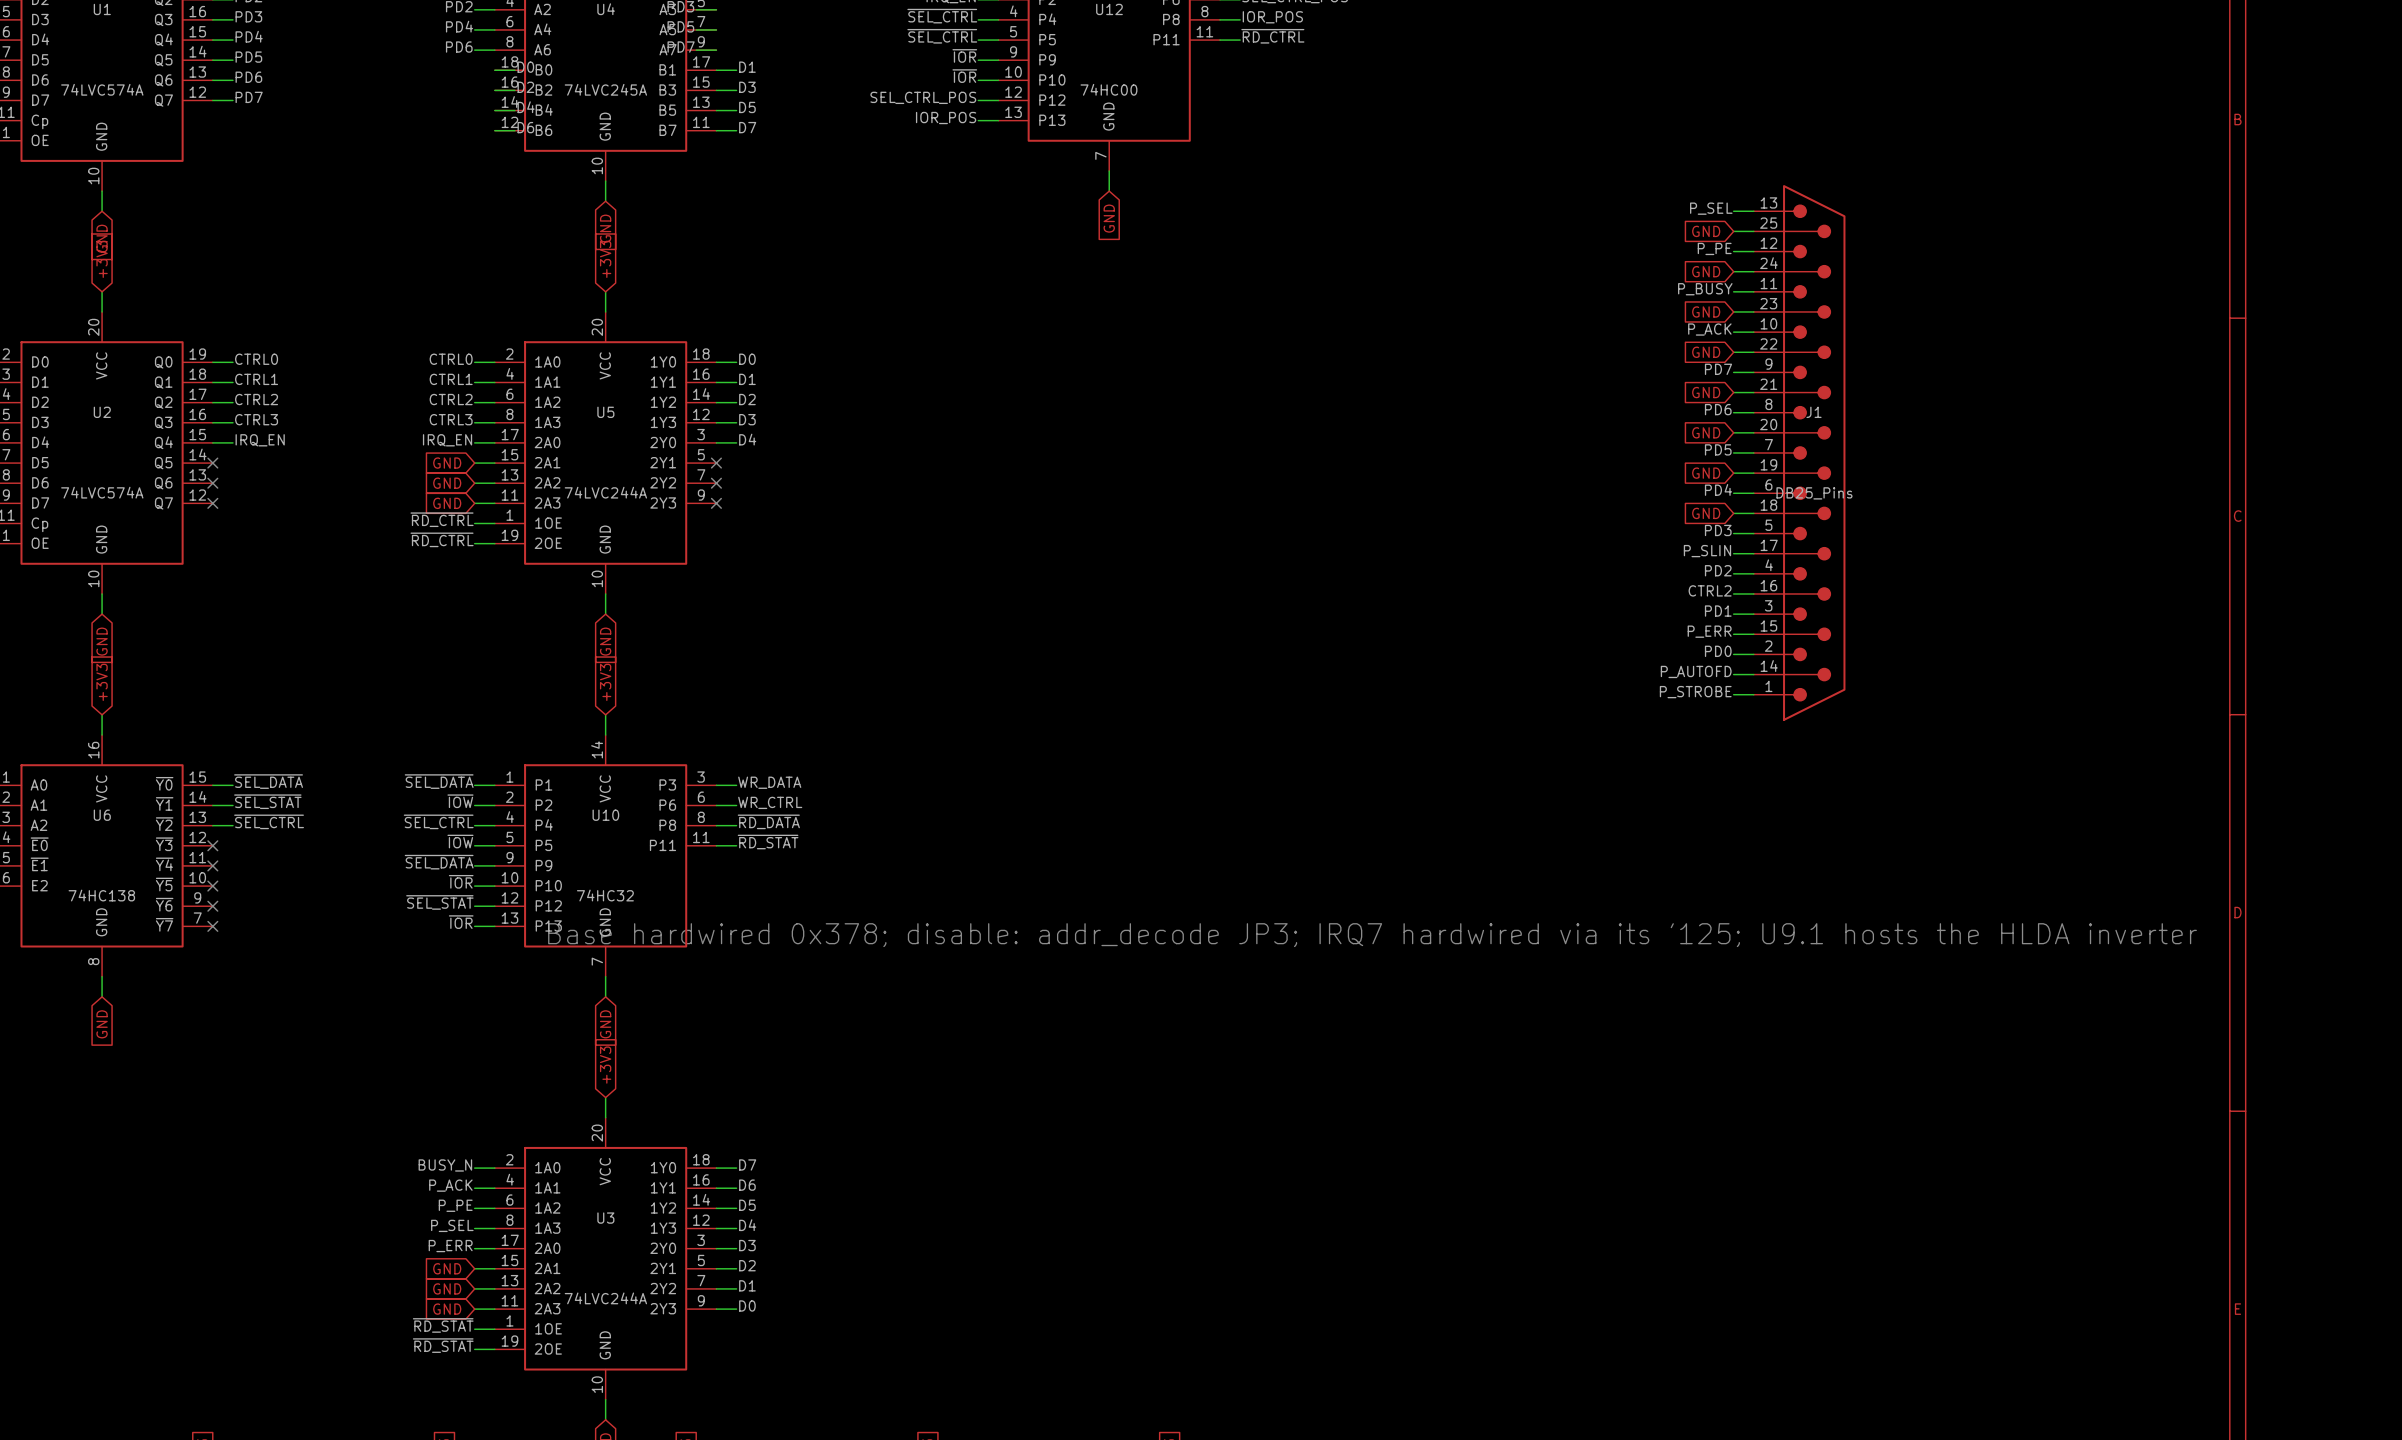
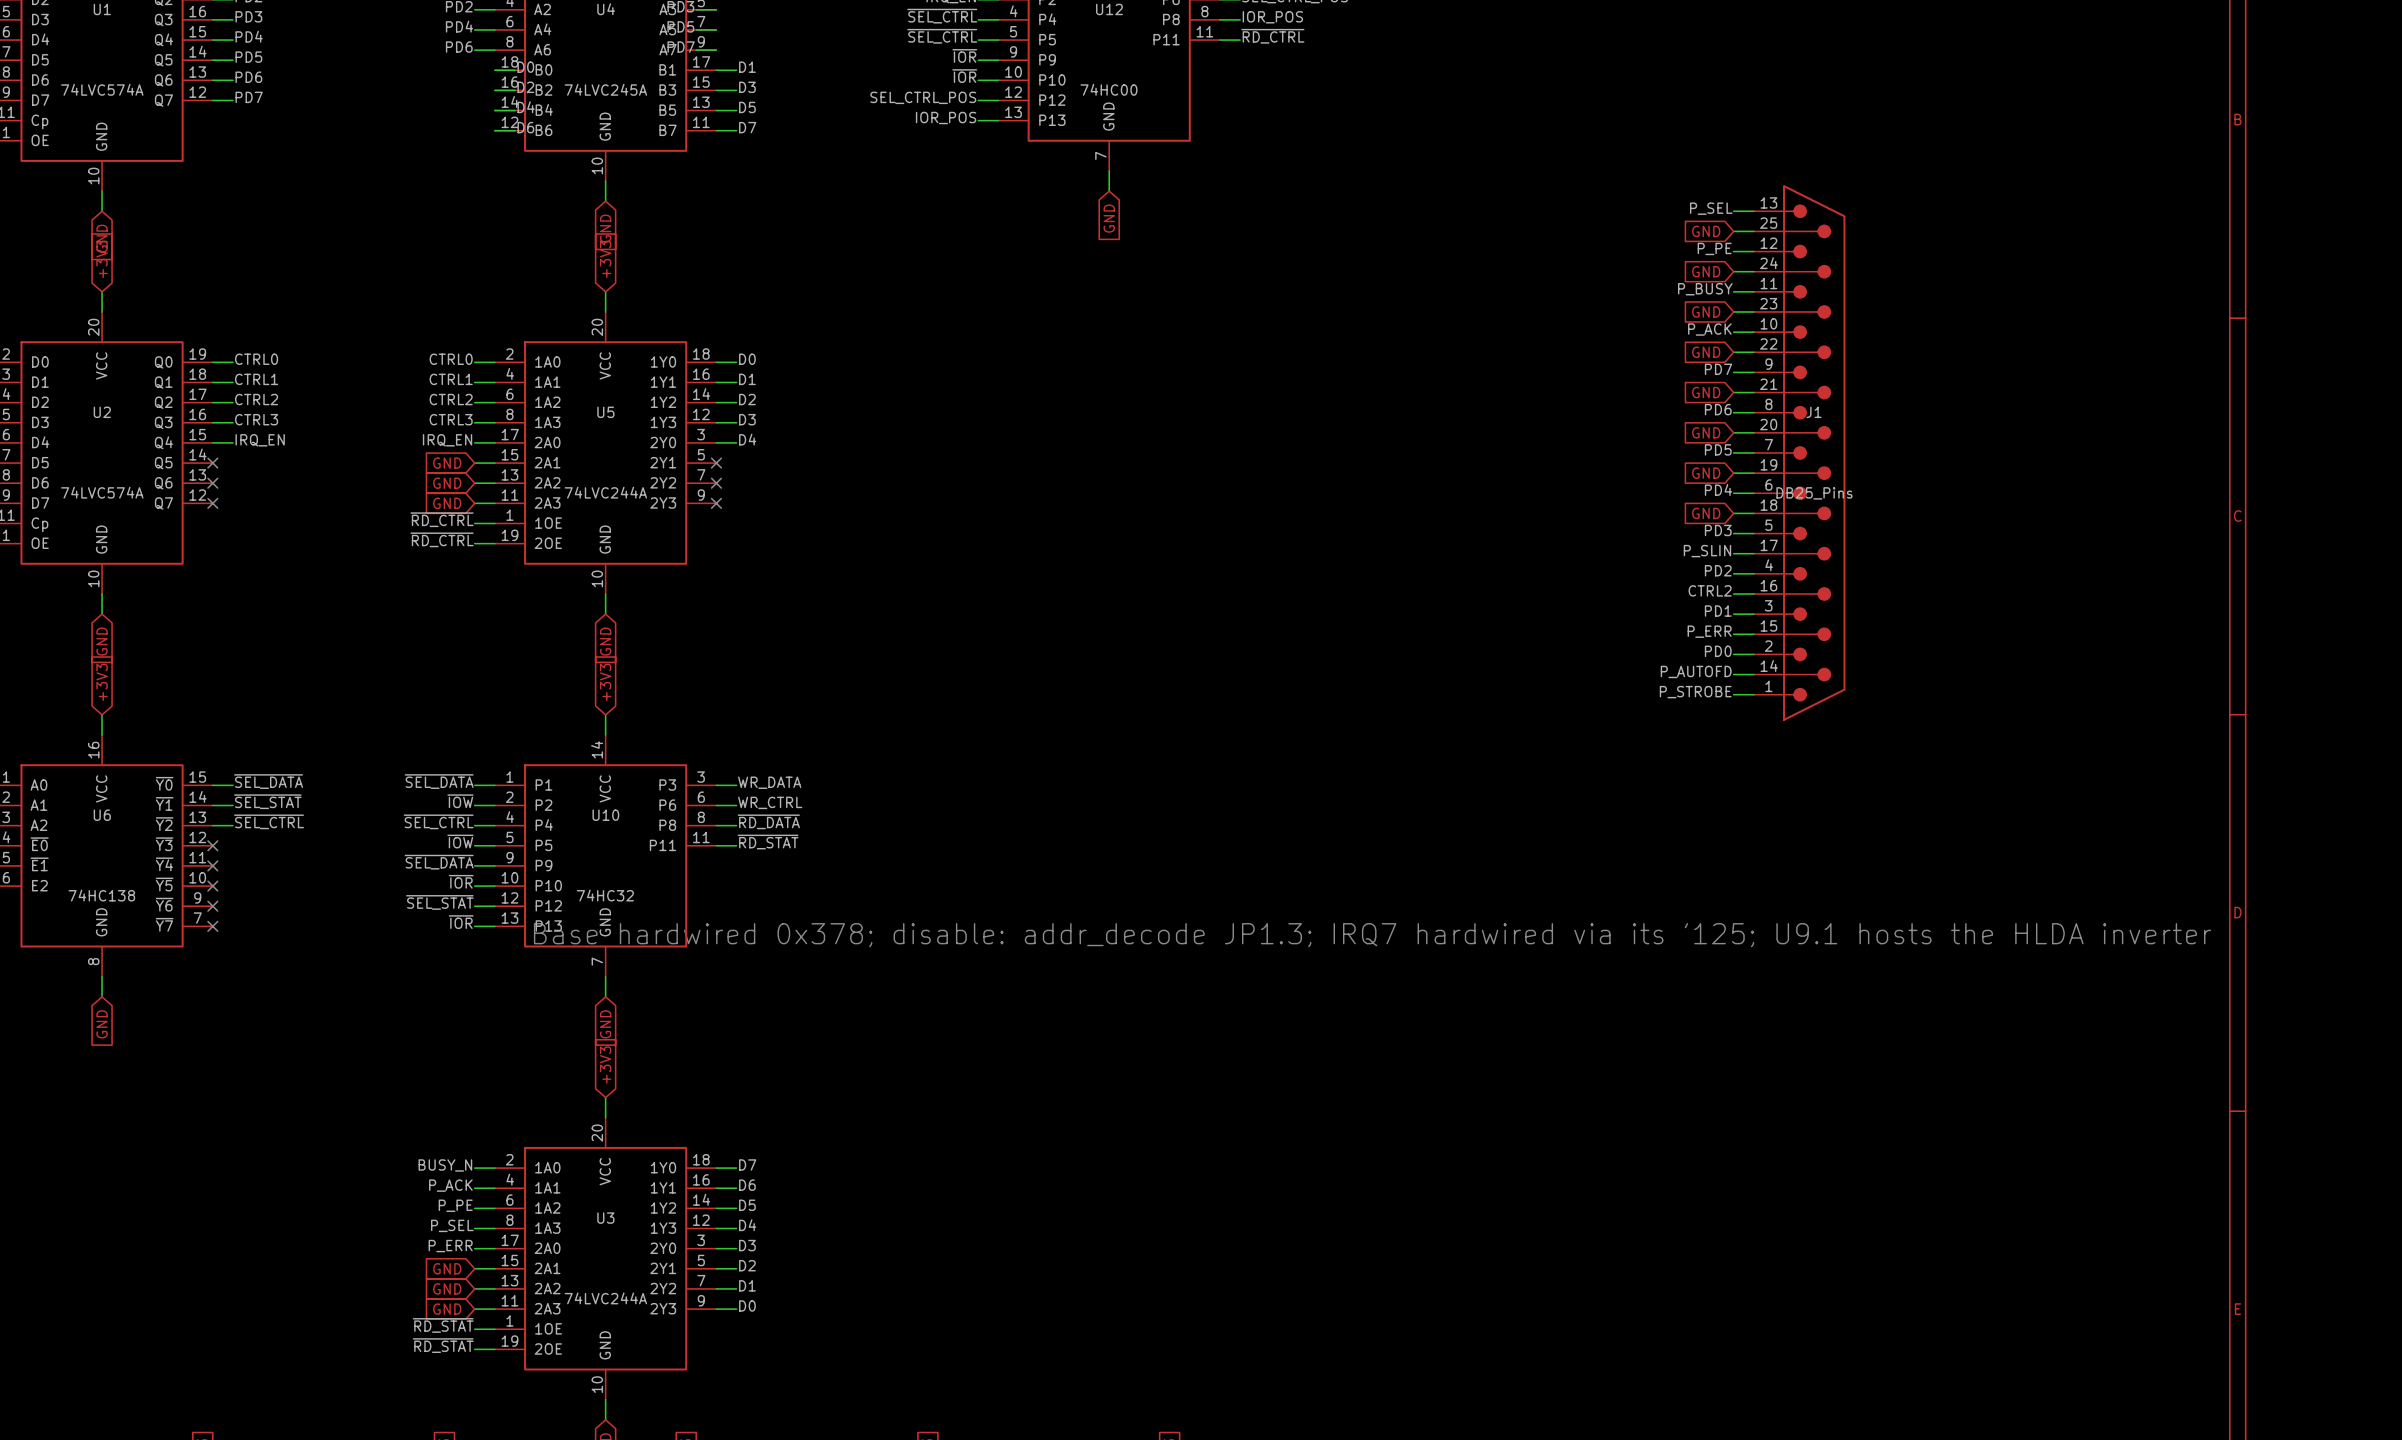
text: Base hardwired 0x378; disable: addr_decode JP3; IRQ7 hardwired via its '125; U9.1 hosts the HLDA inverter (1372, 935) -> Base hardwired 0x378; disable: addr_decode JP1.3; IRQ7 hardwired via its '125; U9.1 hosts the HLDA inverter (1372, 935)

